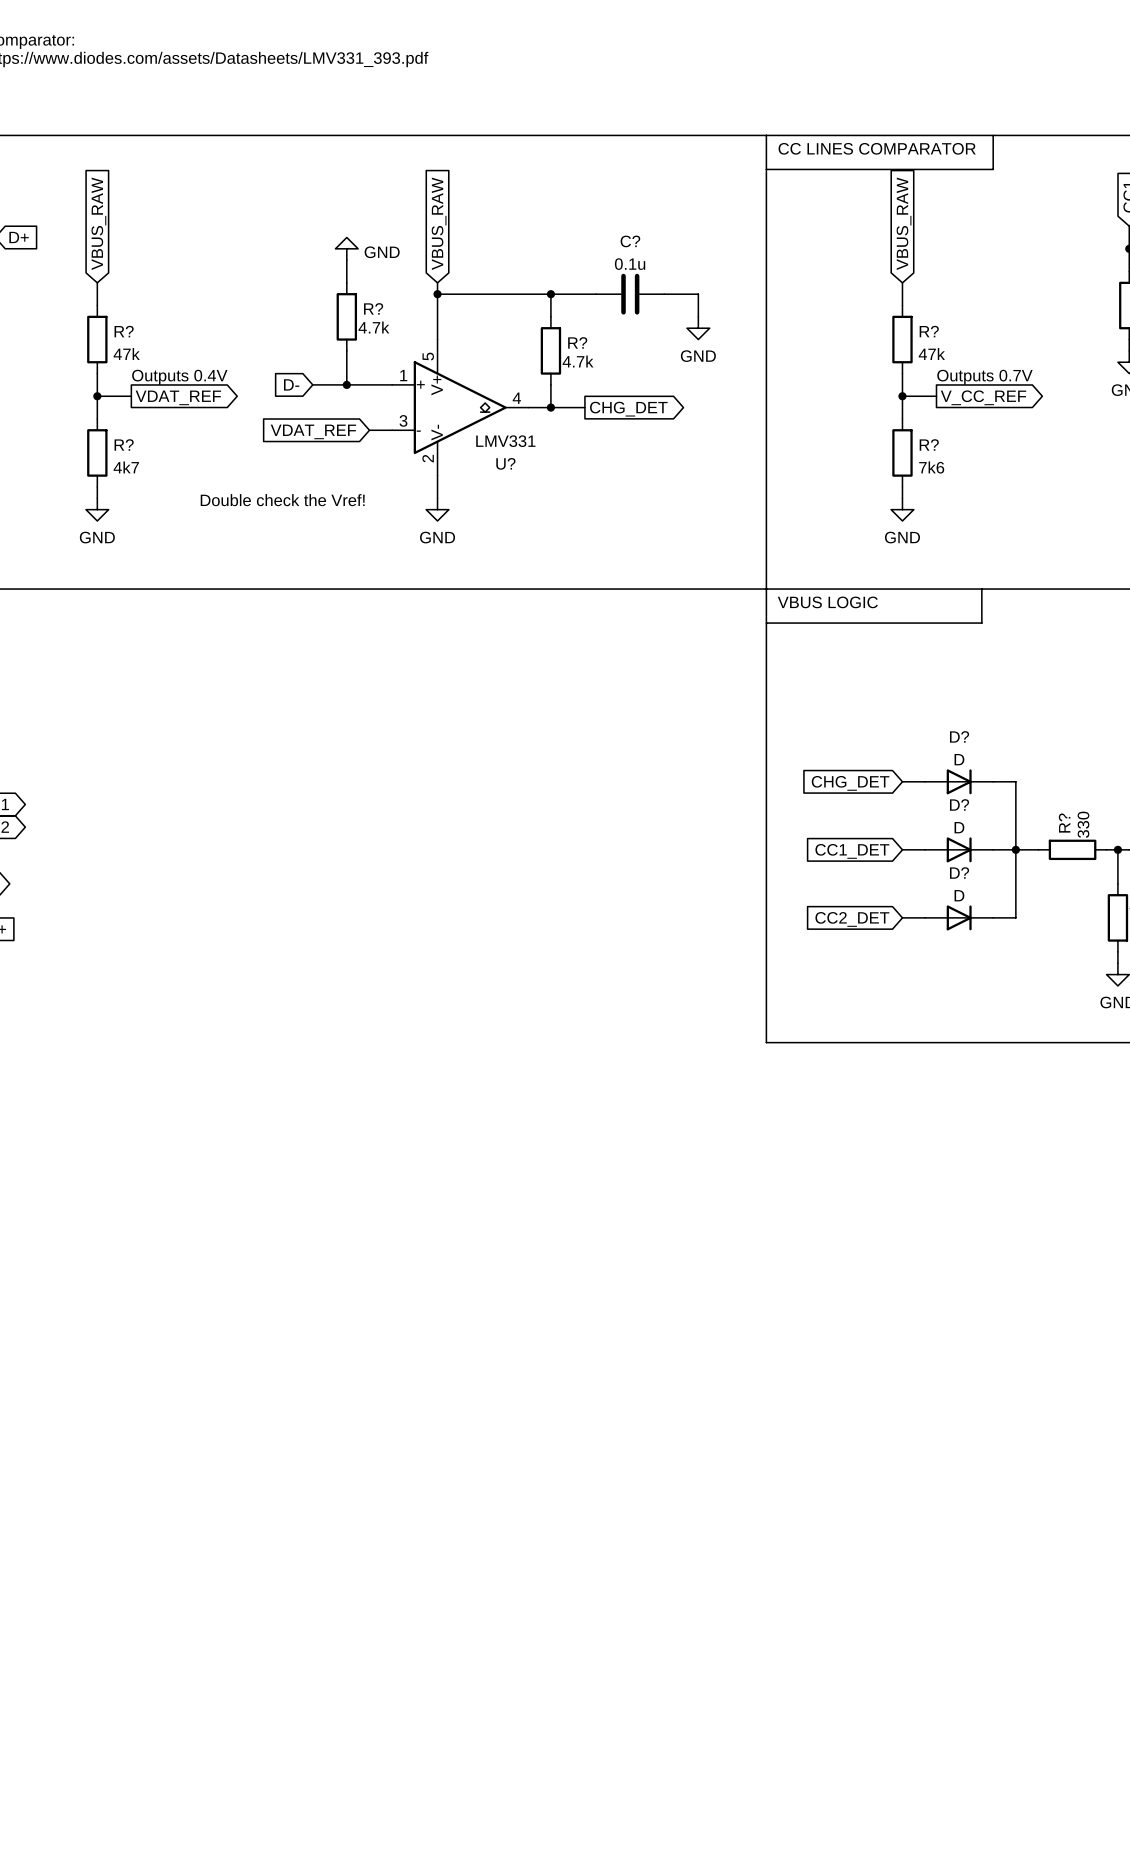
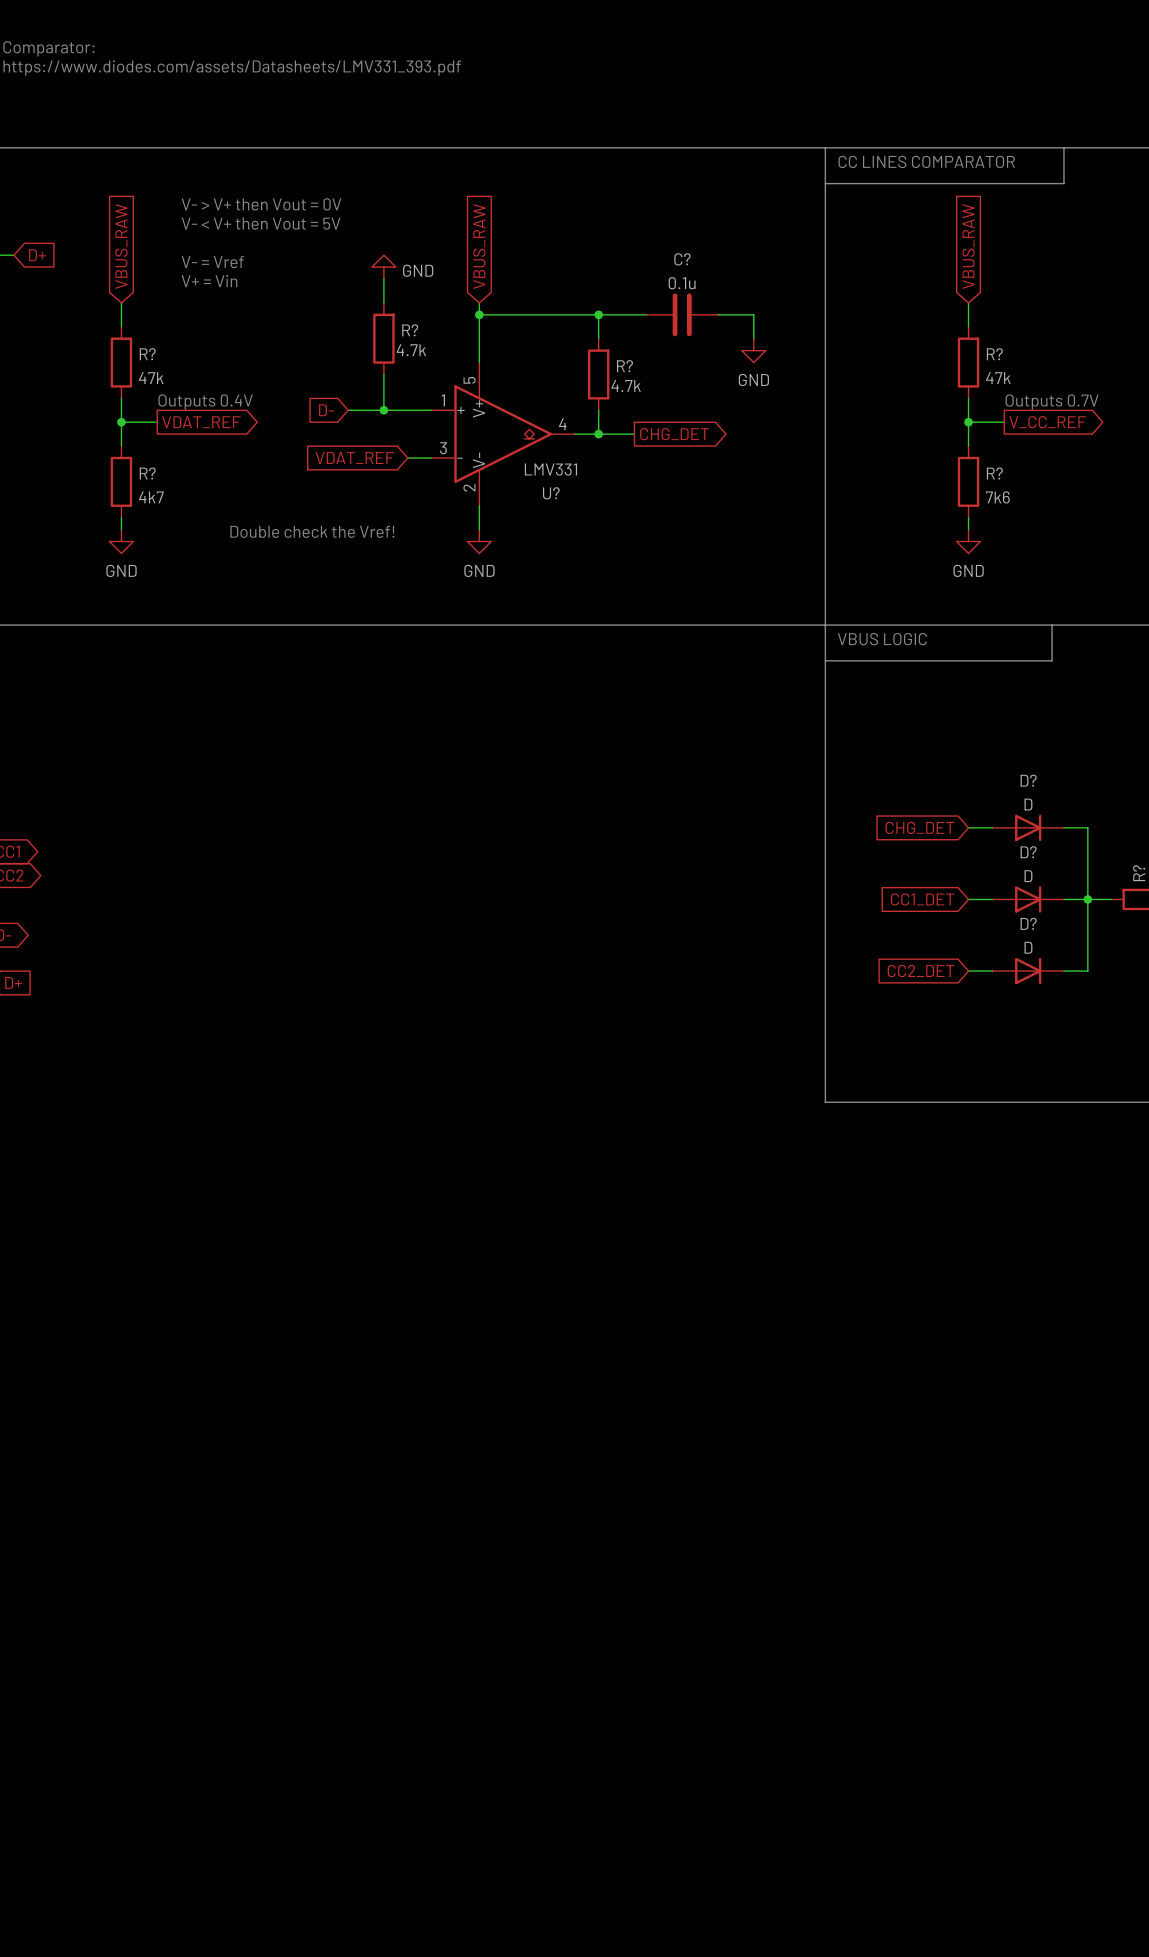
text: none -> V- > V+ then Vout = 0V (261, 204)
text: none -> V- < V+ then Vout = 5V (261, 223)
text: none -> V- = Vref (212, 262)
text: none -> V+ = Vin (209, 281)

